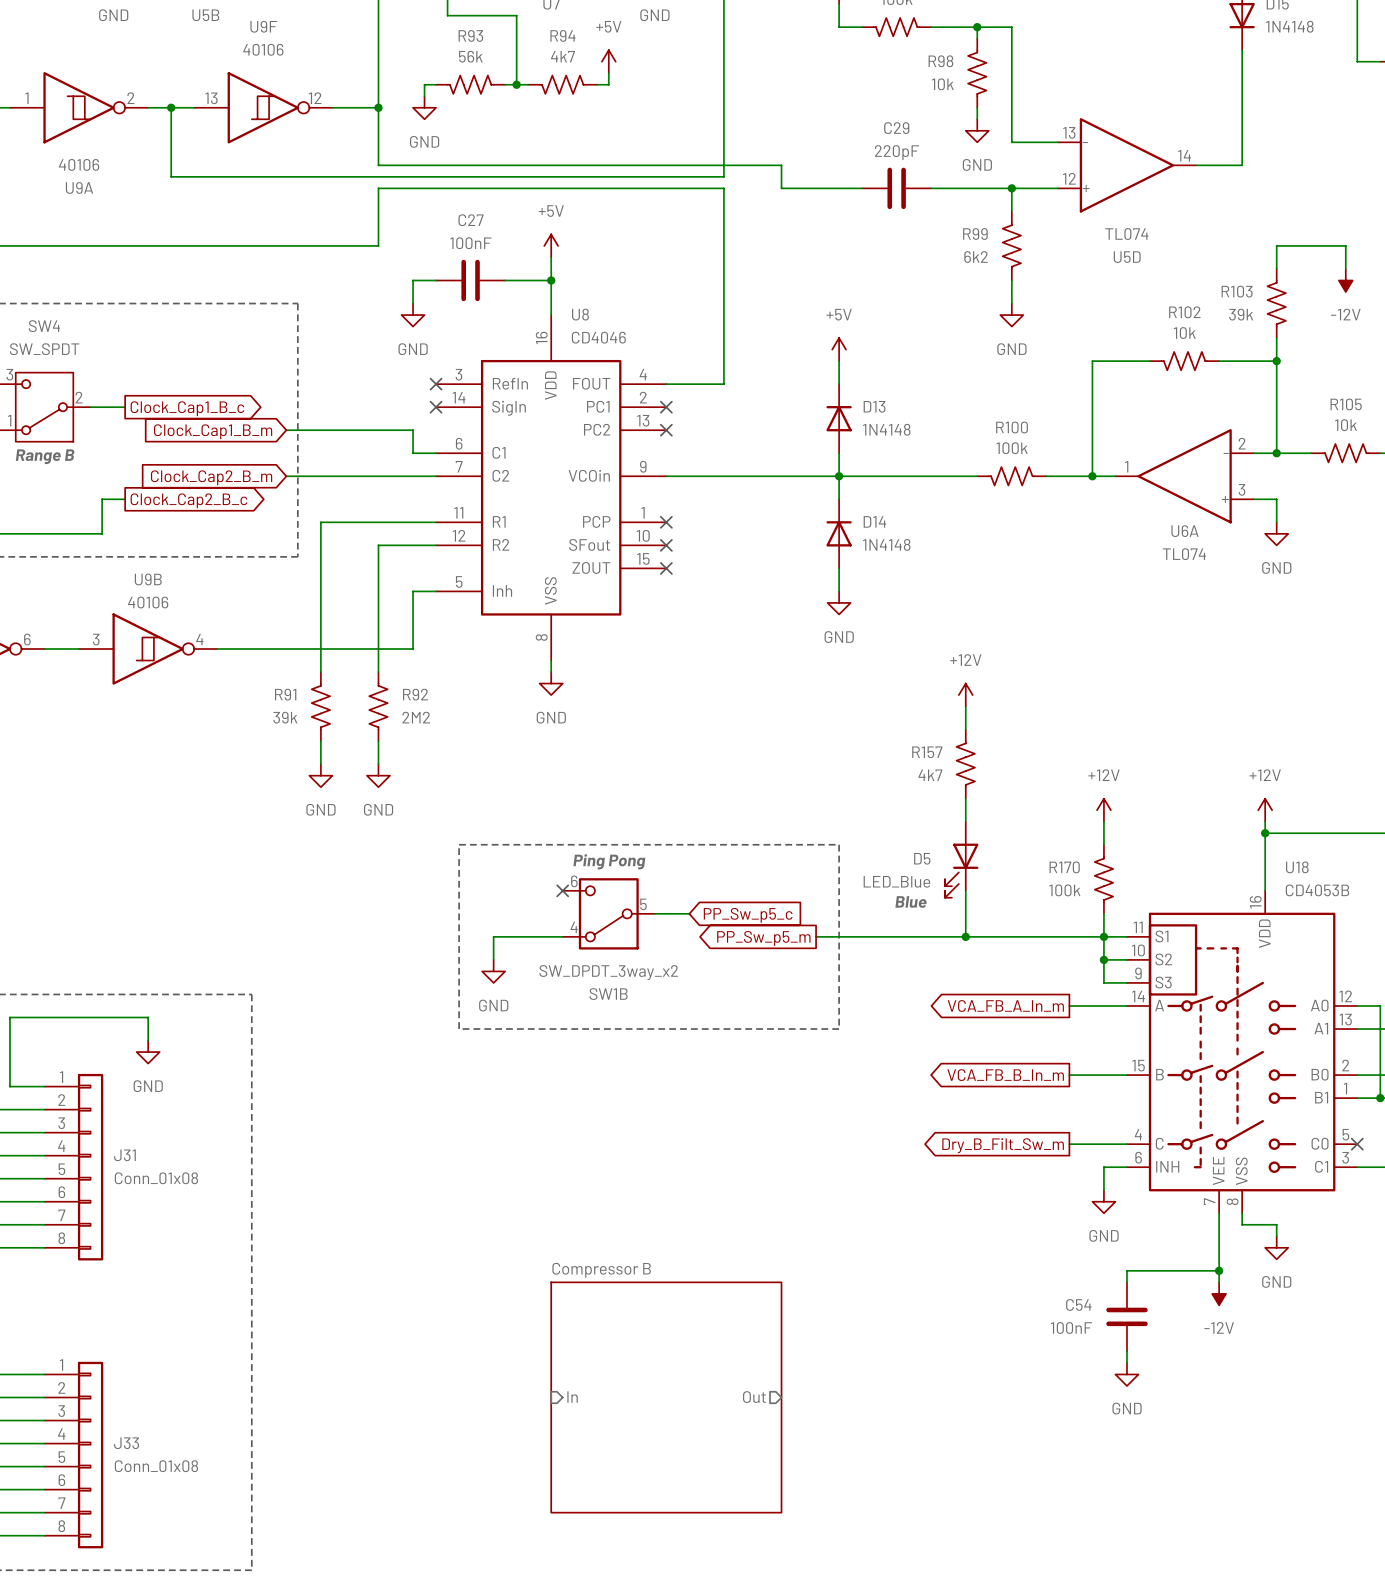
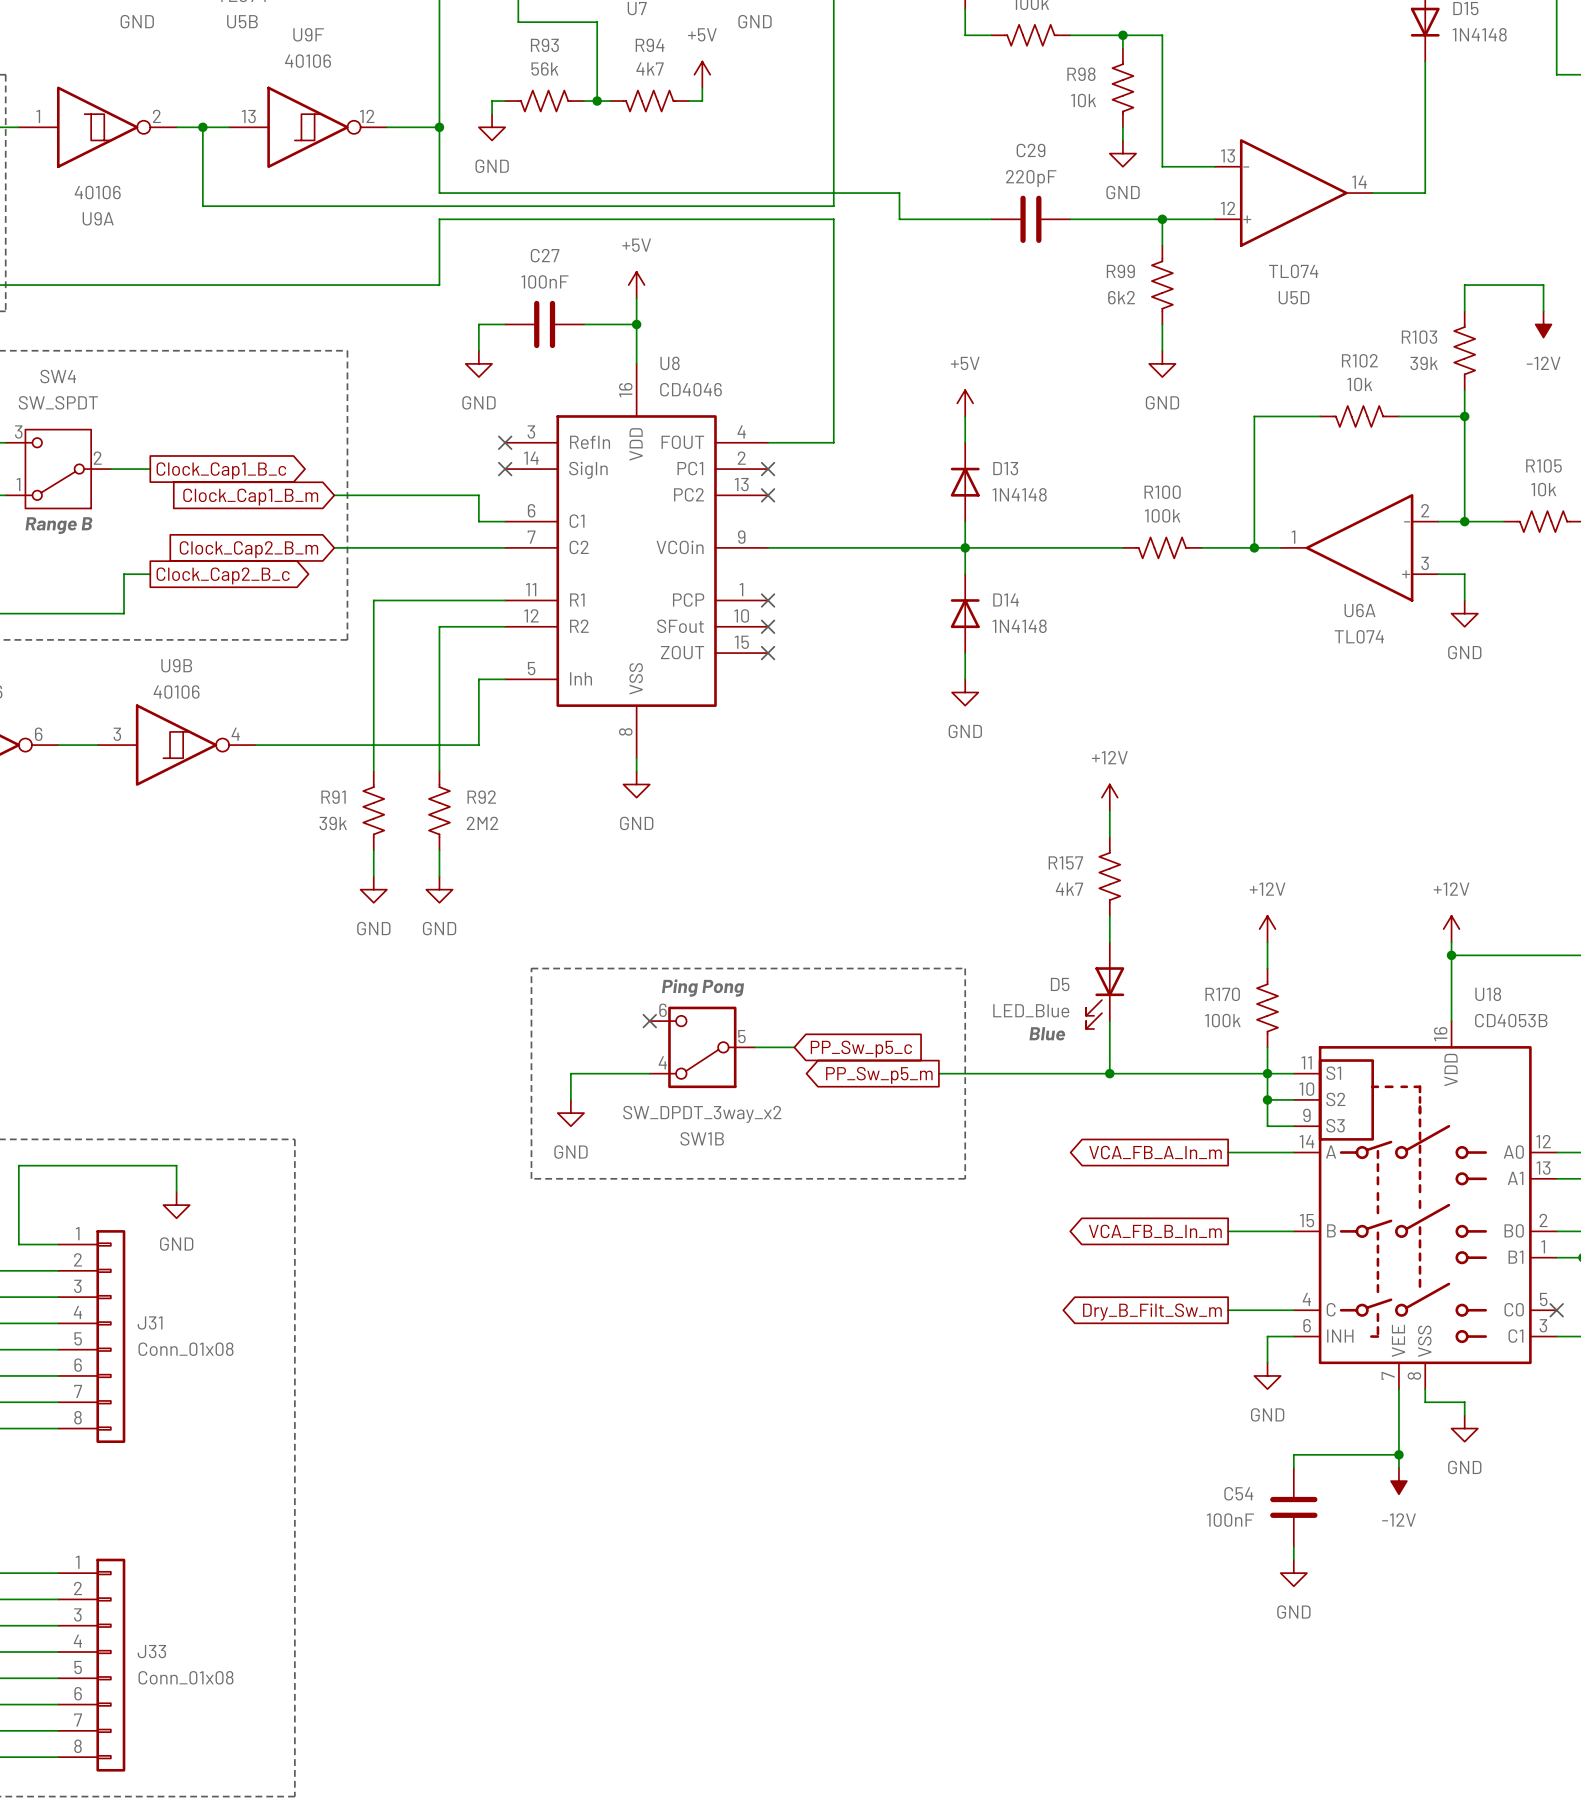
sheet pin: In (572, 1397) -> none
sheet Compressor B: (666, 1397) -> none
sheet pin: Out (754, 1397) -> none

